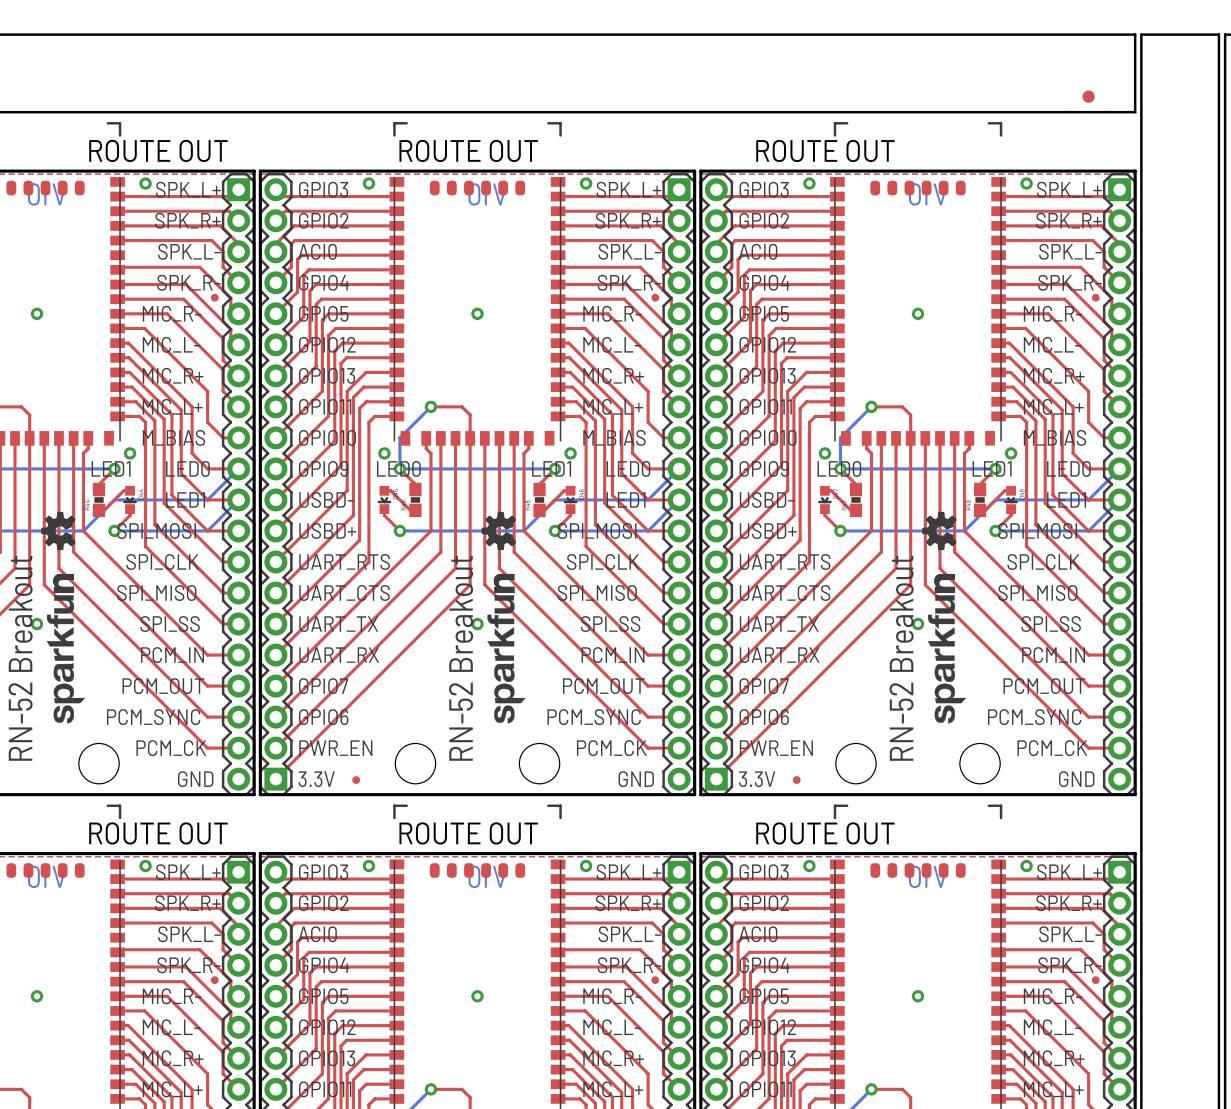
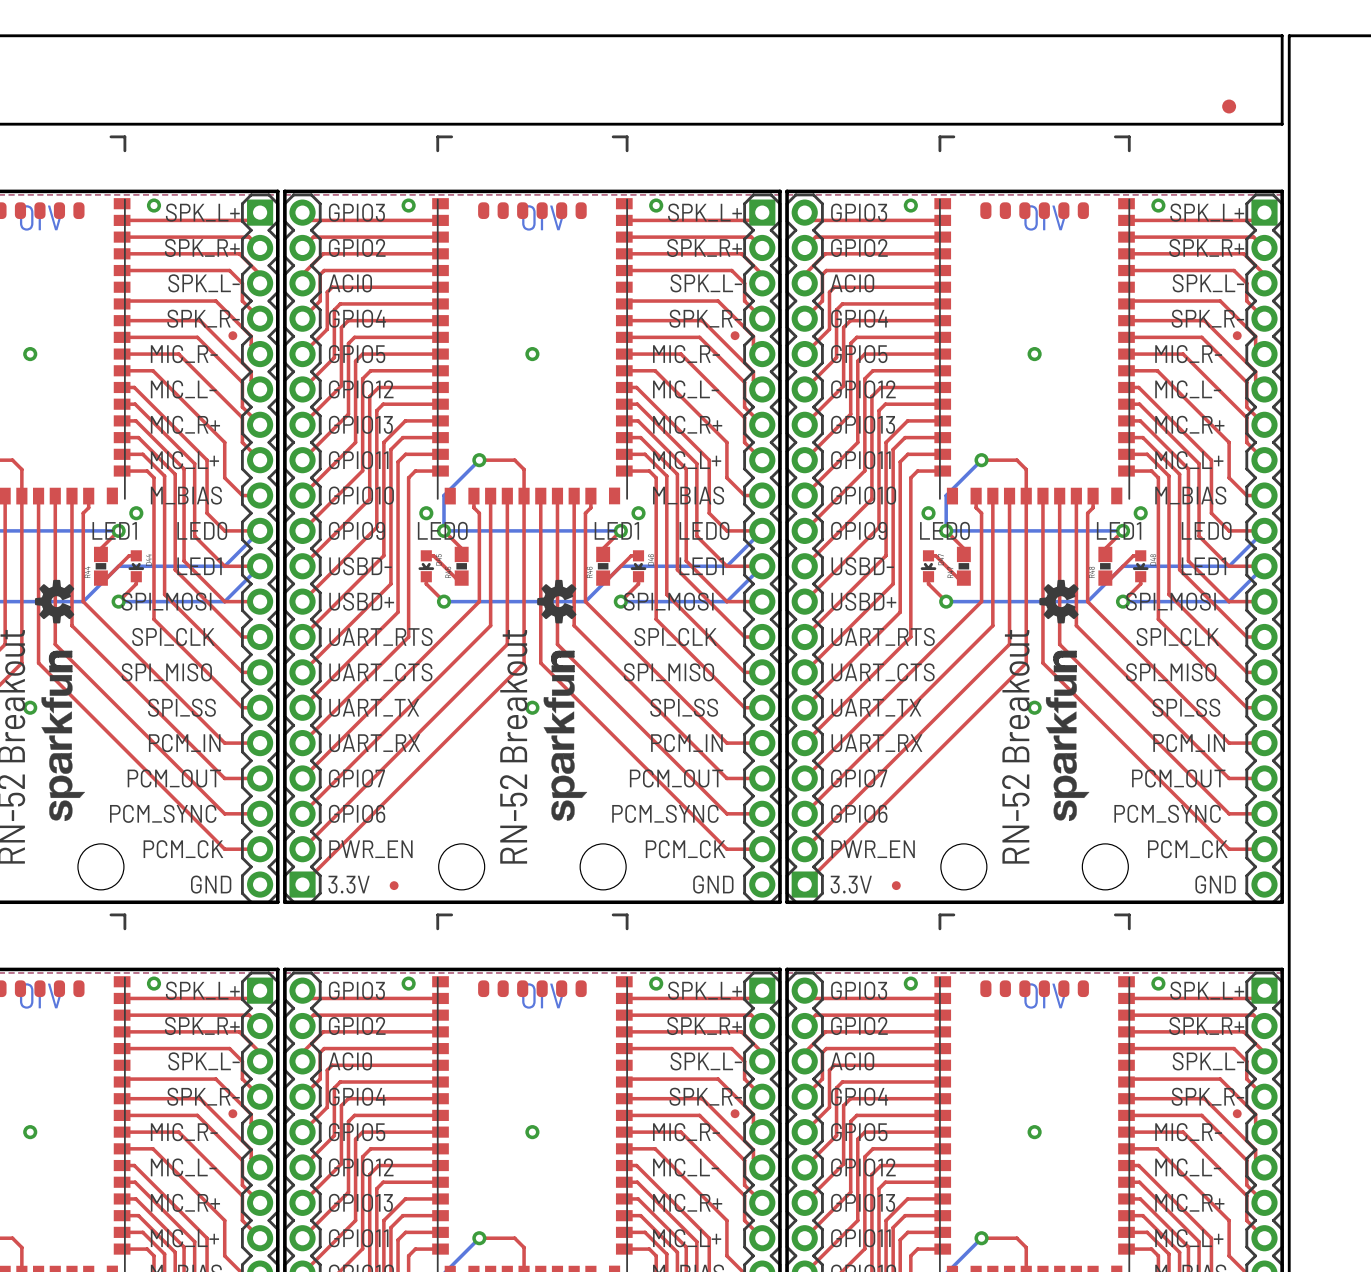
text: ROUTE OUT (158, 150) -> none
text: ROUTE OUT (468, 150) -> none
text: ROUTE OUT (825, 150) -> none
text: ROUTE OUT (158, 833) -> none
text: ROUTE OUT (468, 833) -> none
text: ROUTE OUT (825, 833) -> none

